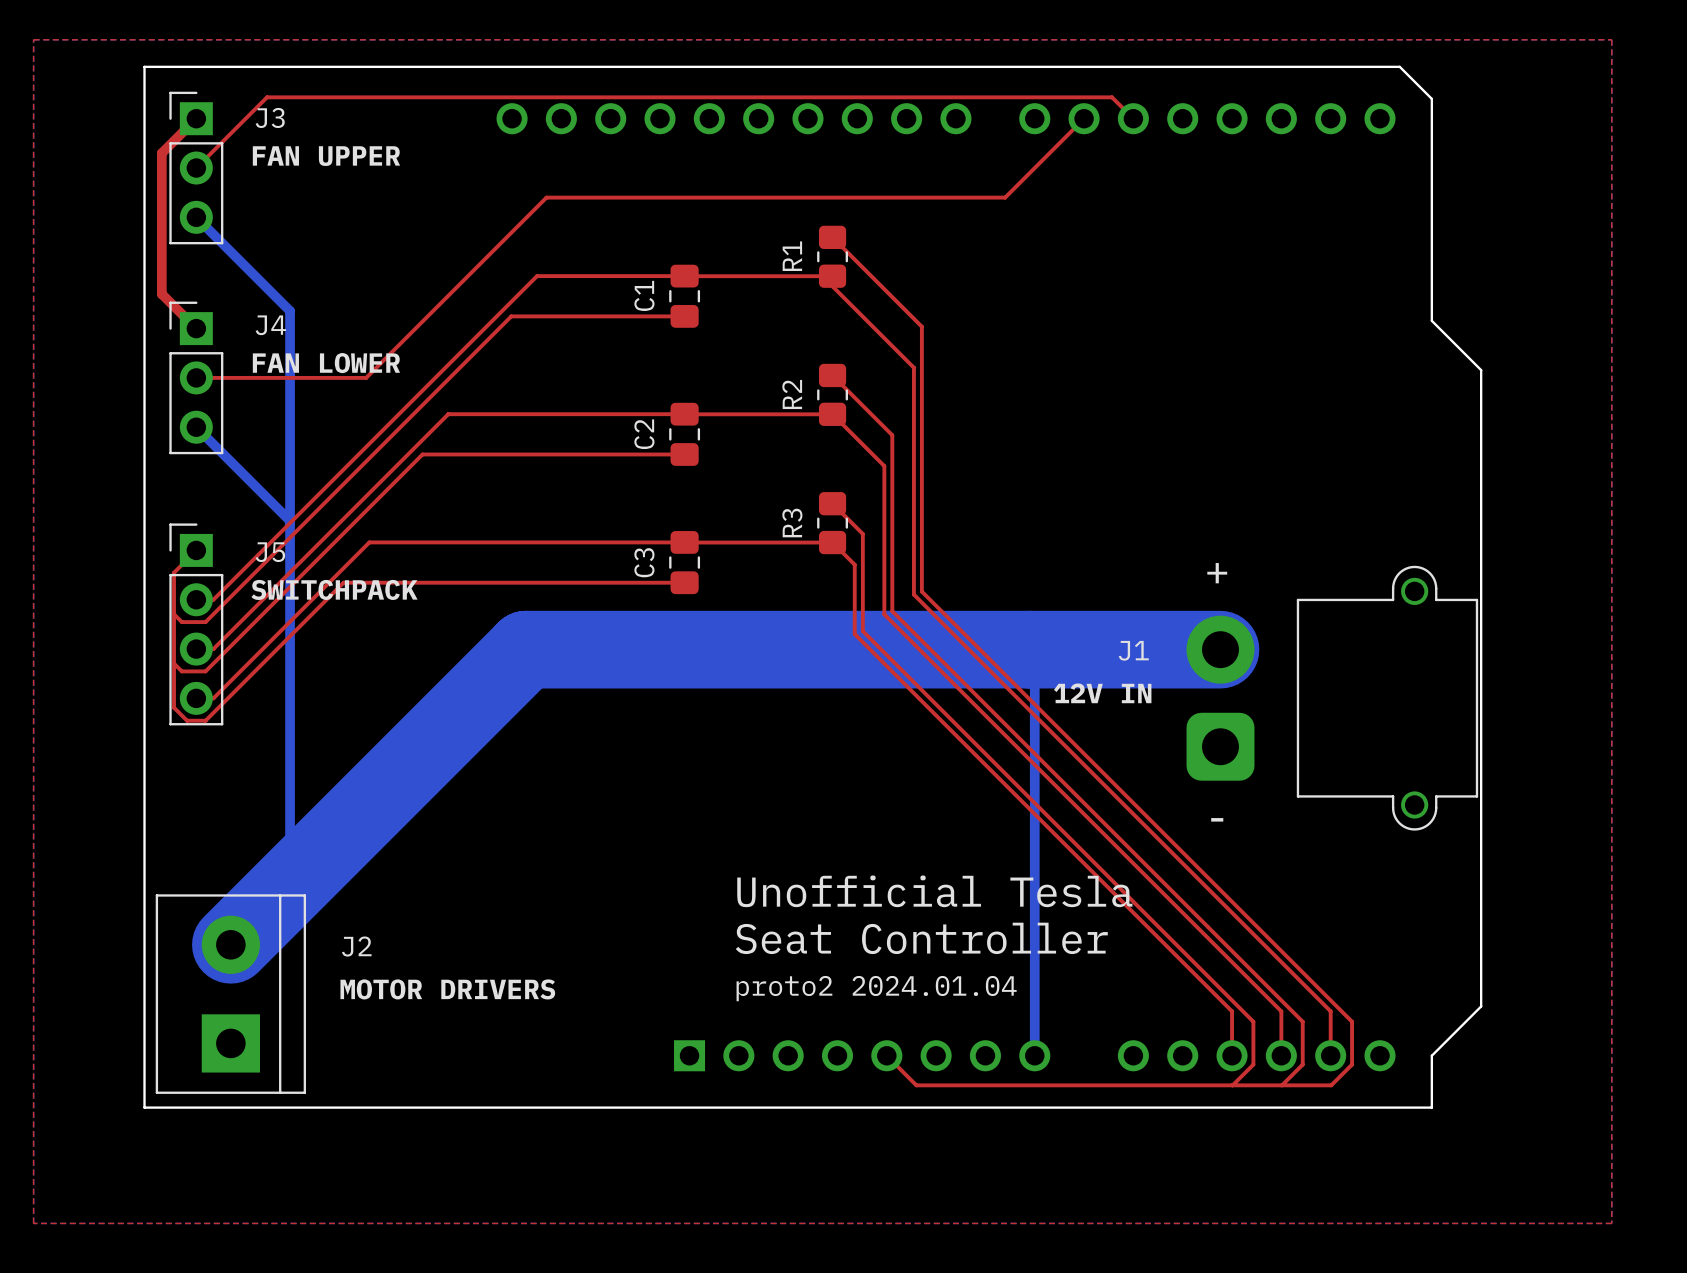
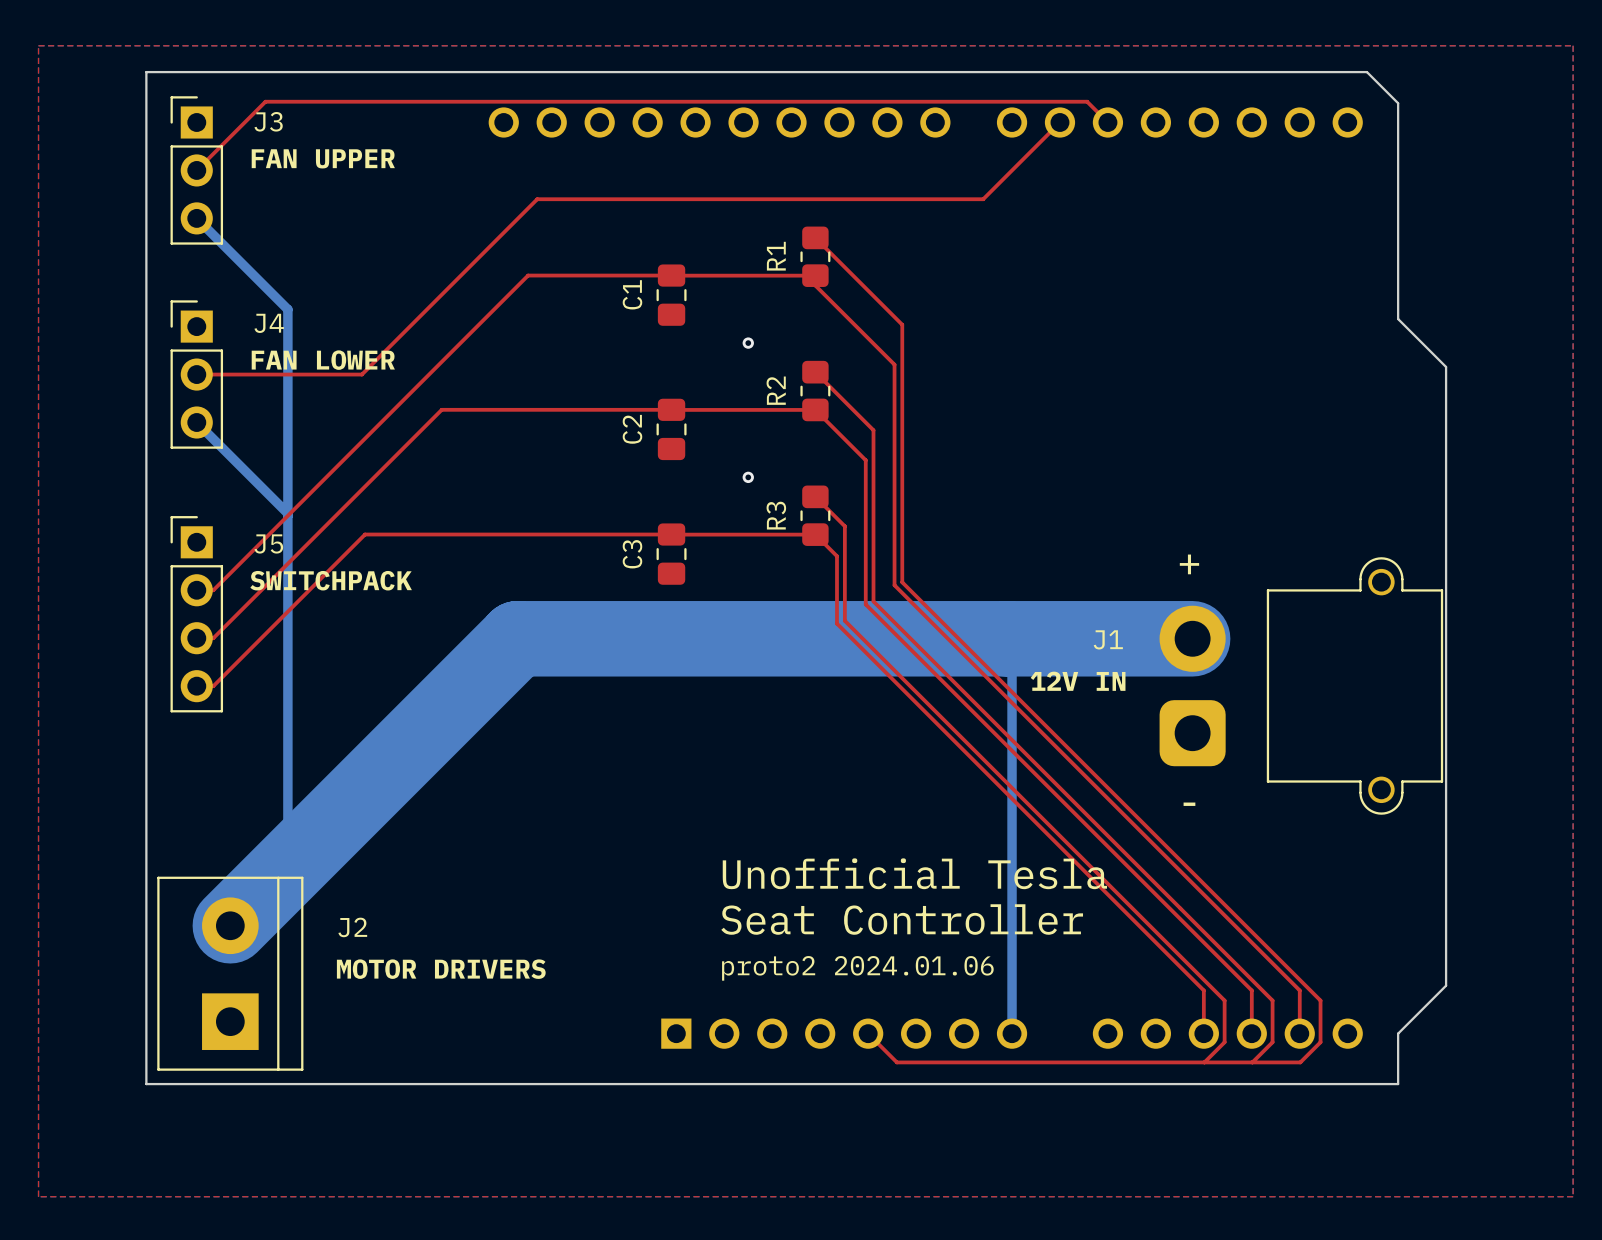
top track: (196, 118) (161, 153) (161, 294) (196, 328) -> none
top track: (684, 316) (511, 316) (205, 622) (181, 622) (174, 614) -> none
via: none -> (748, 343)
top track: (684, 454) (422, 454) (205, 671) (181, 671) (174, 663) -> none
via: none -> (748, 477)
top track: (196, 550) (174, 572) (174, 707) (187, 720) (205, 720) (343, 582) (684, 582) -> none
text: proto2 2024.01.04 (876, 988) -> proto2 2024.01.06 (857, 968)

